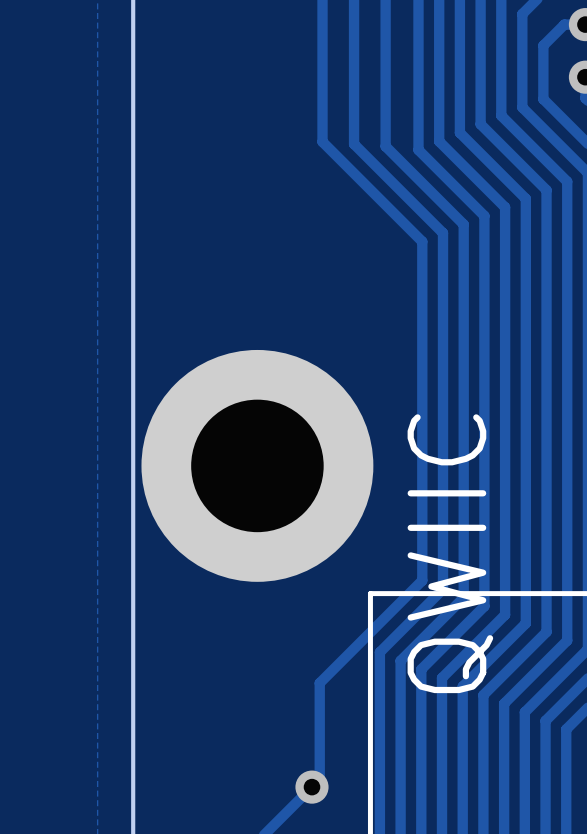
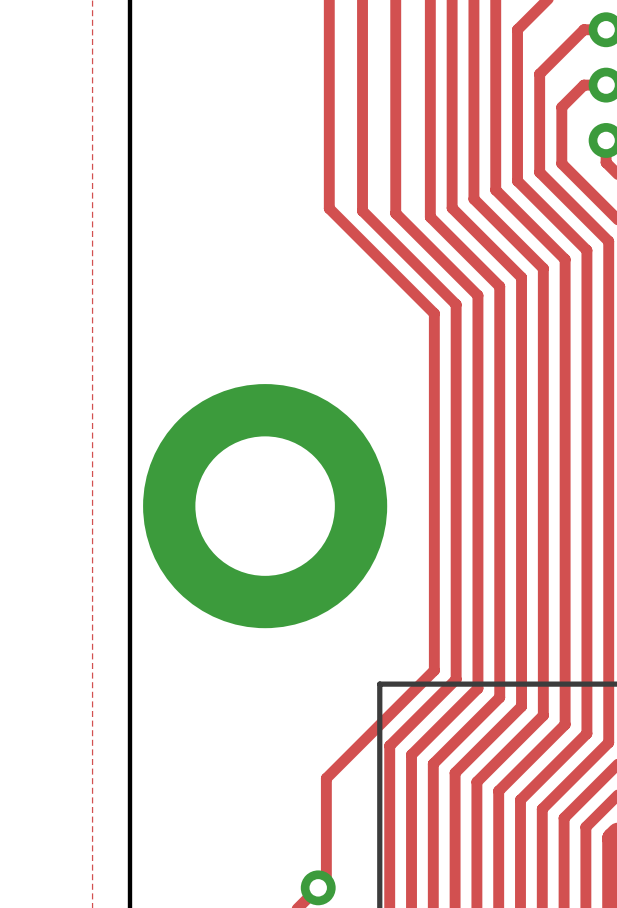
part position: (257, 465) -> (265, 506)
text: QWIIC (450, 553) -> none

